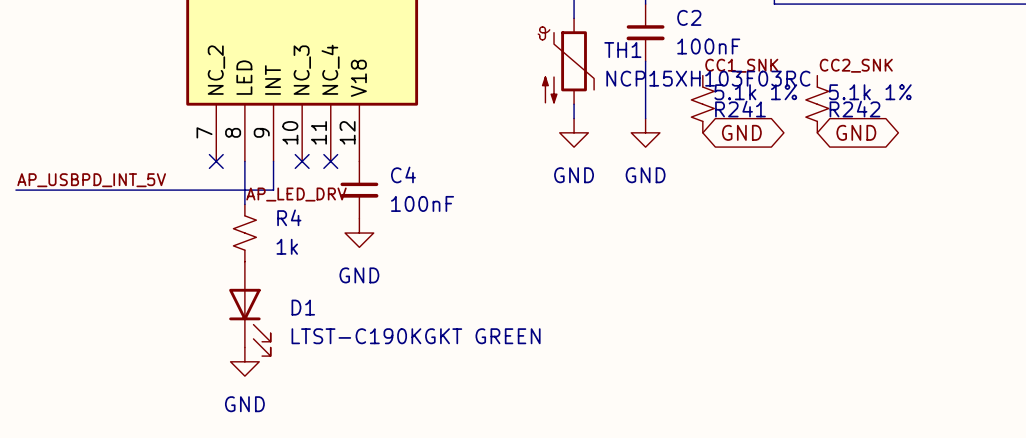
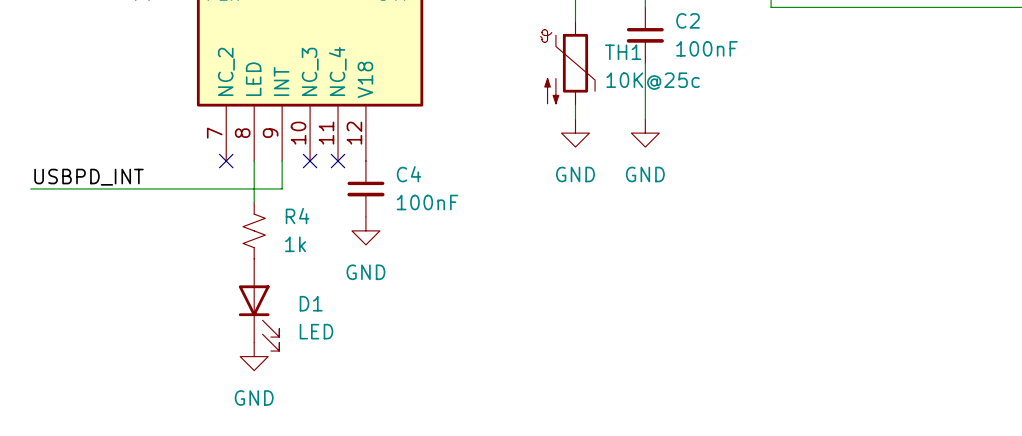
label: CC1_SNK (741, 65) -> none
label: CC2_SNK (856, 65) -> none
TH1 value: NCP15XH103F03RC (708, 78) -> 10K@25c (653, 81)
R241: 5.1k 1% (702, 104) -> none
R242: 5.1k 1% (817, 104) -> none
global label: GND (741, 132) -> none
global label: GND (856, 132) -> none
label: AP_USBPD_INT_5V (91, 180) -> USBPD_INT (88, 177)
label: AP_LED_DRV (296, 194) -> none
D1 value: LTST-C190KGKT GREEN (416, 336) -> LED (316, 331)

